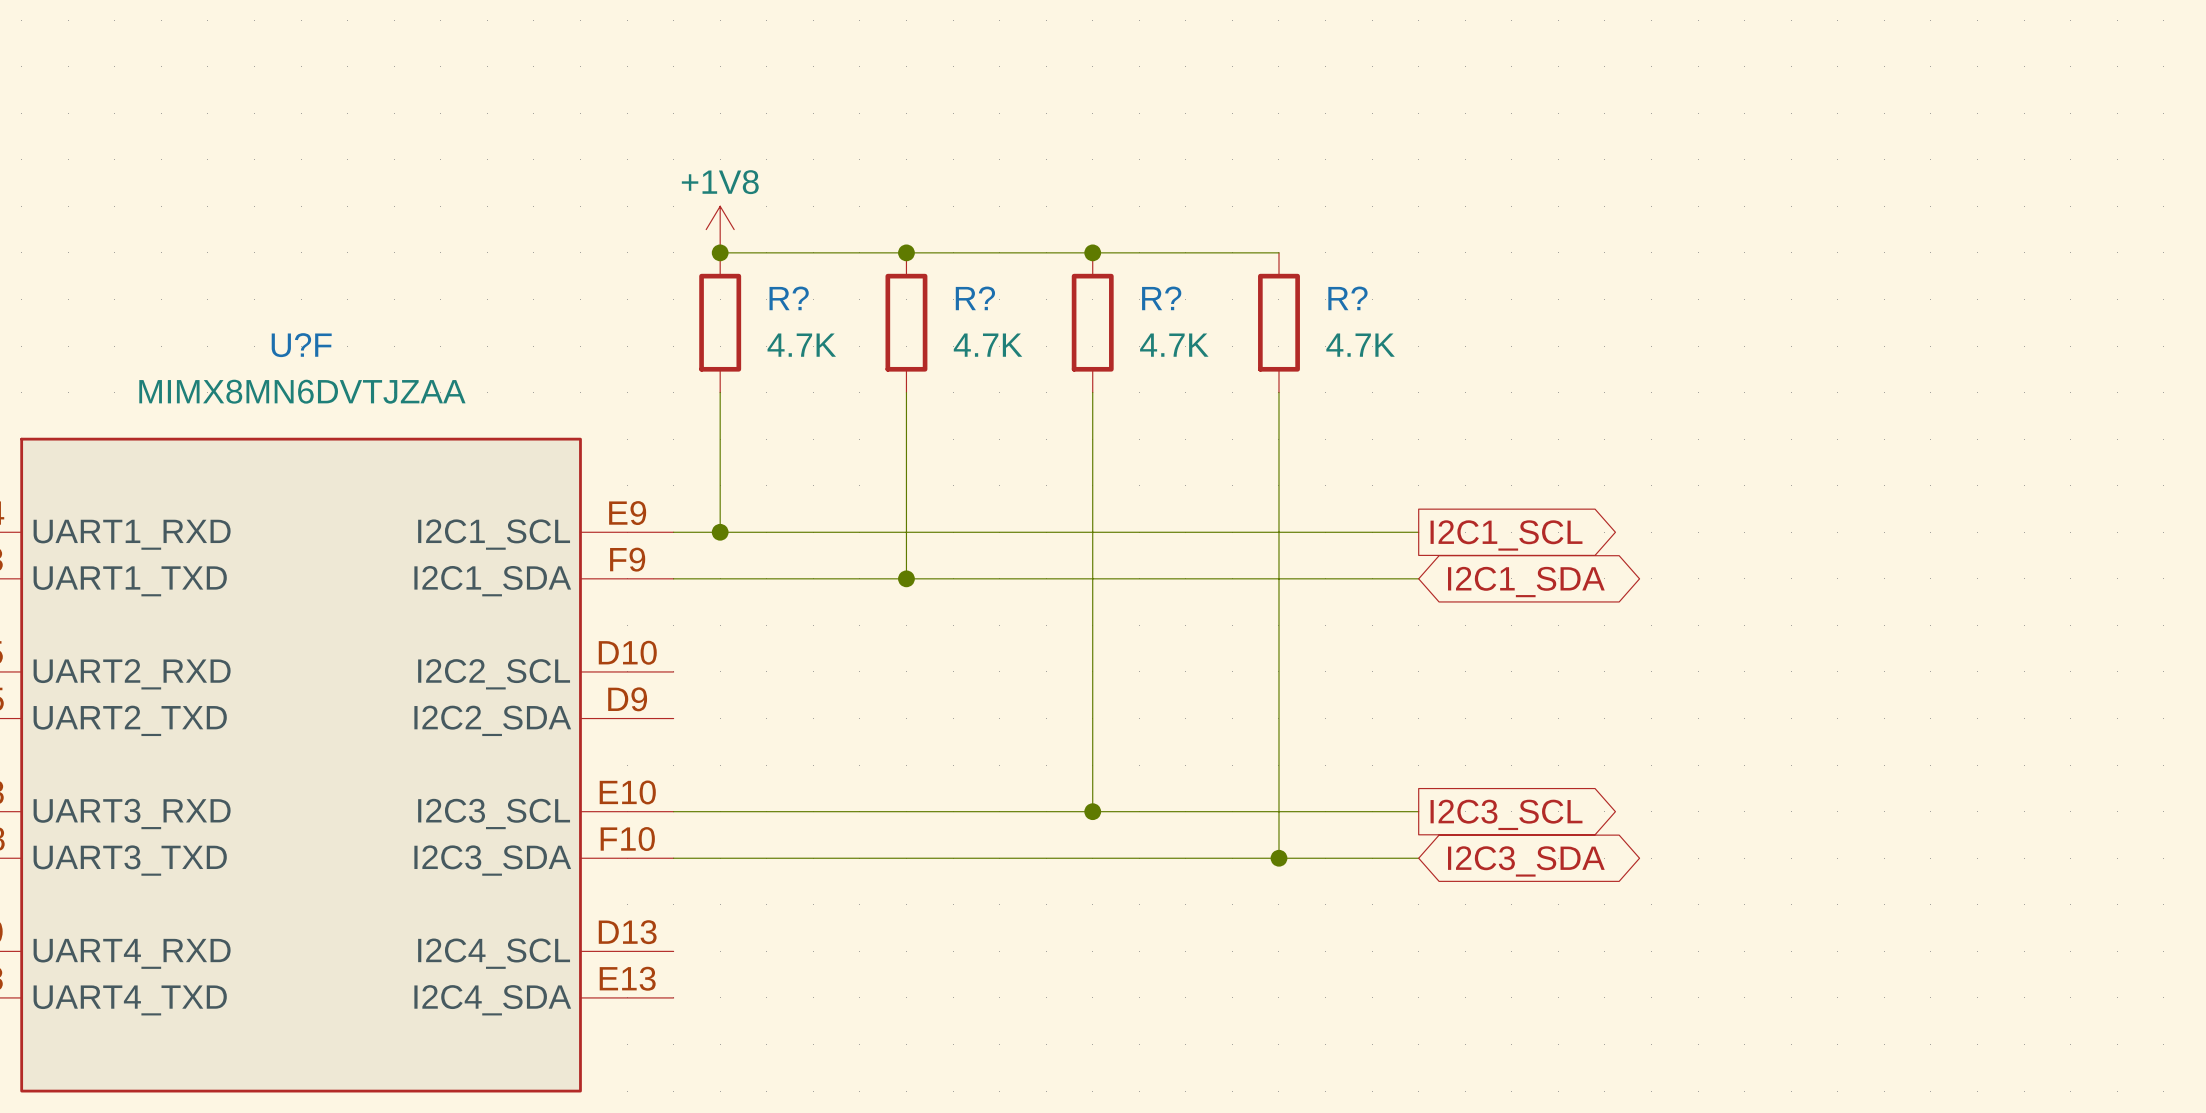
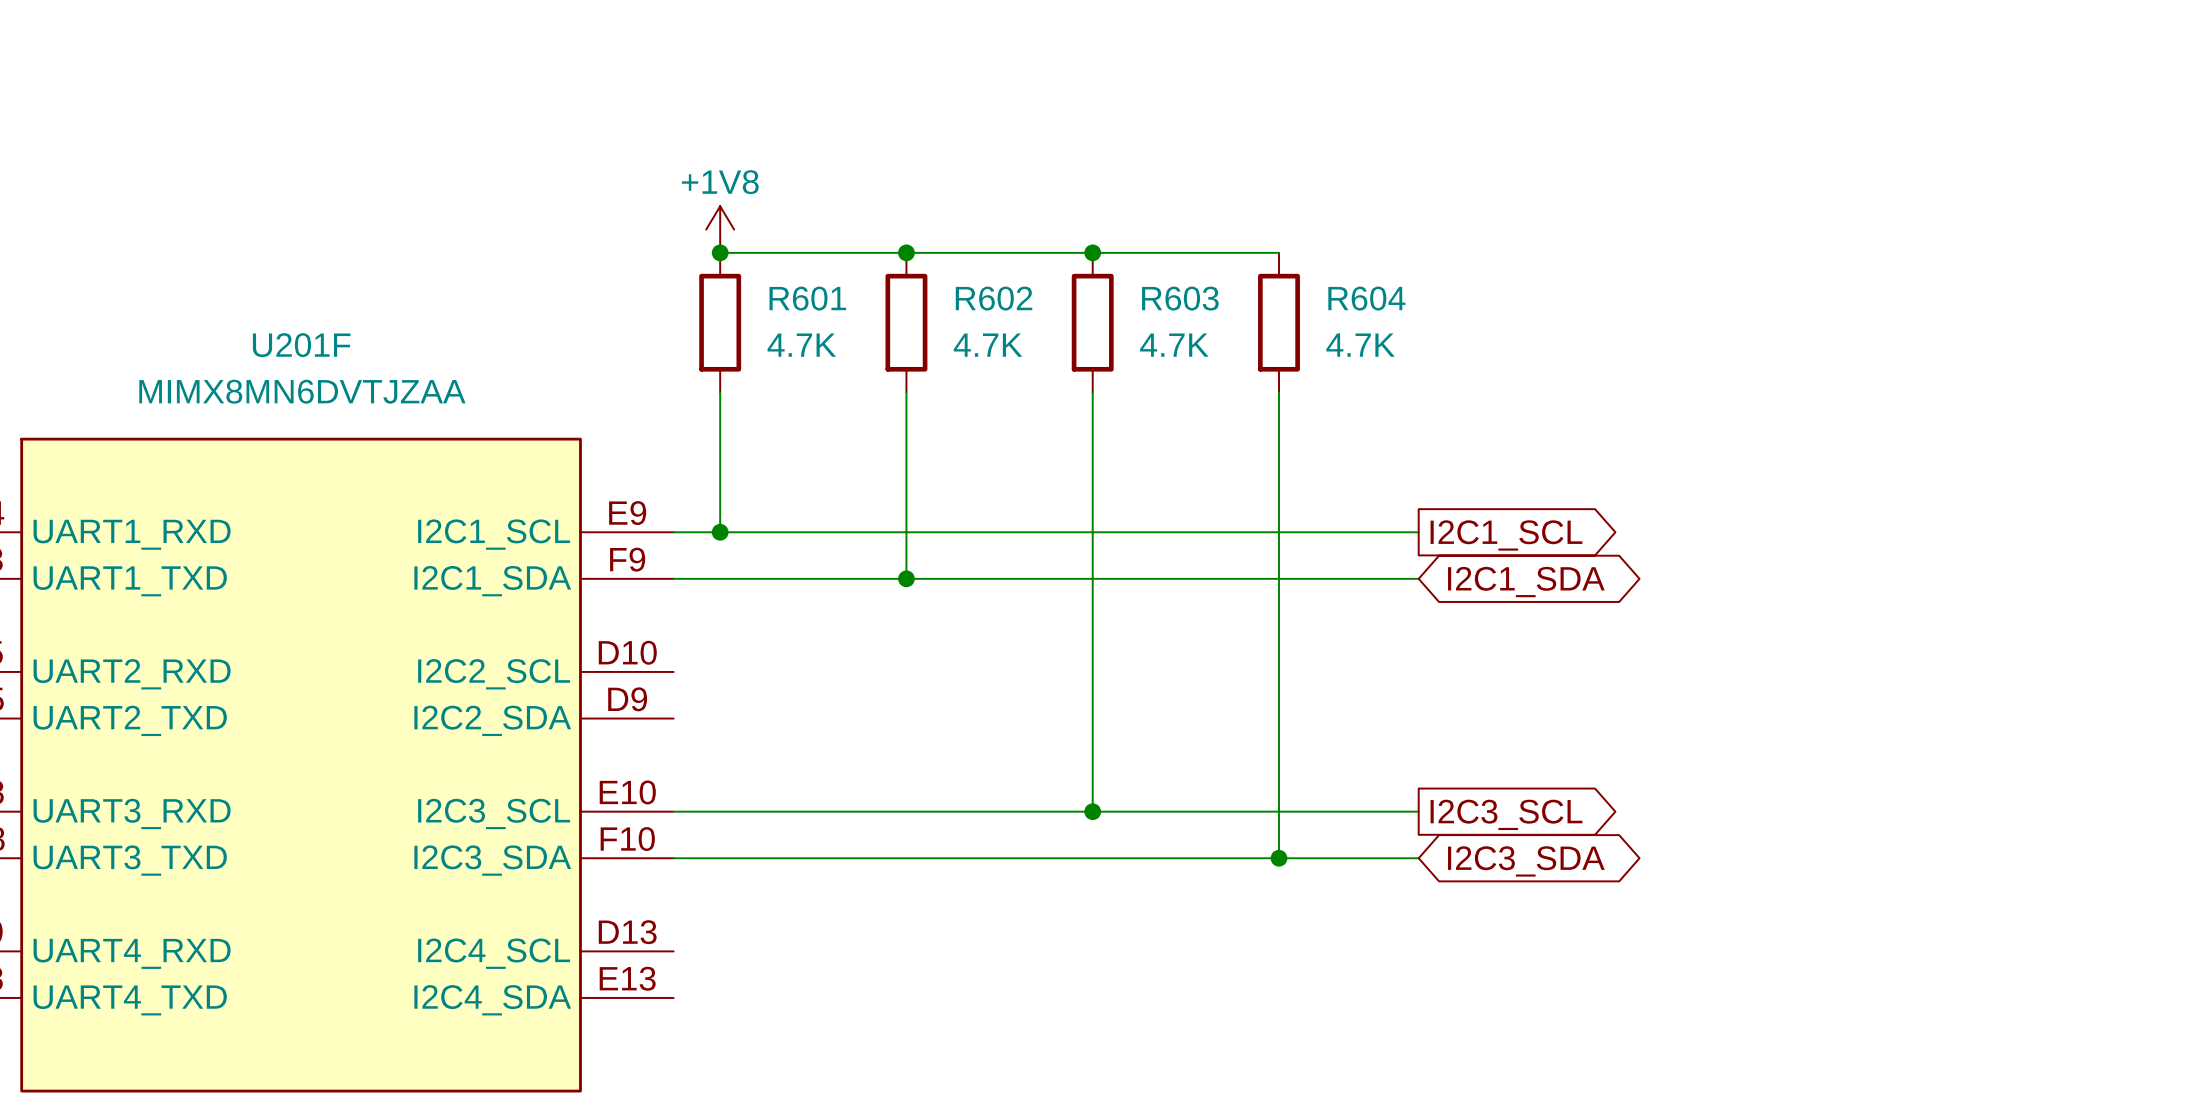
R? name: R? (789, 298) -> R601 (807, 298)
R? name: R? (975, 298) -> R602 (994, 298)
R? name: R? (1161, 298) -> R603 (1180, 298)
R? name: R? (1347, 298) -> R604 (1366, 298)
U?F name: U?F (301, 345) -> U201F (301, 345)

